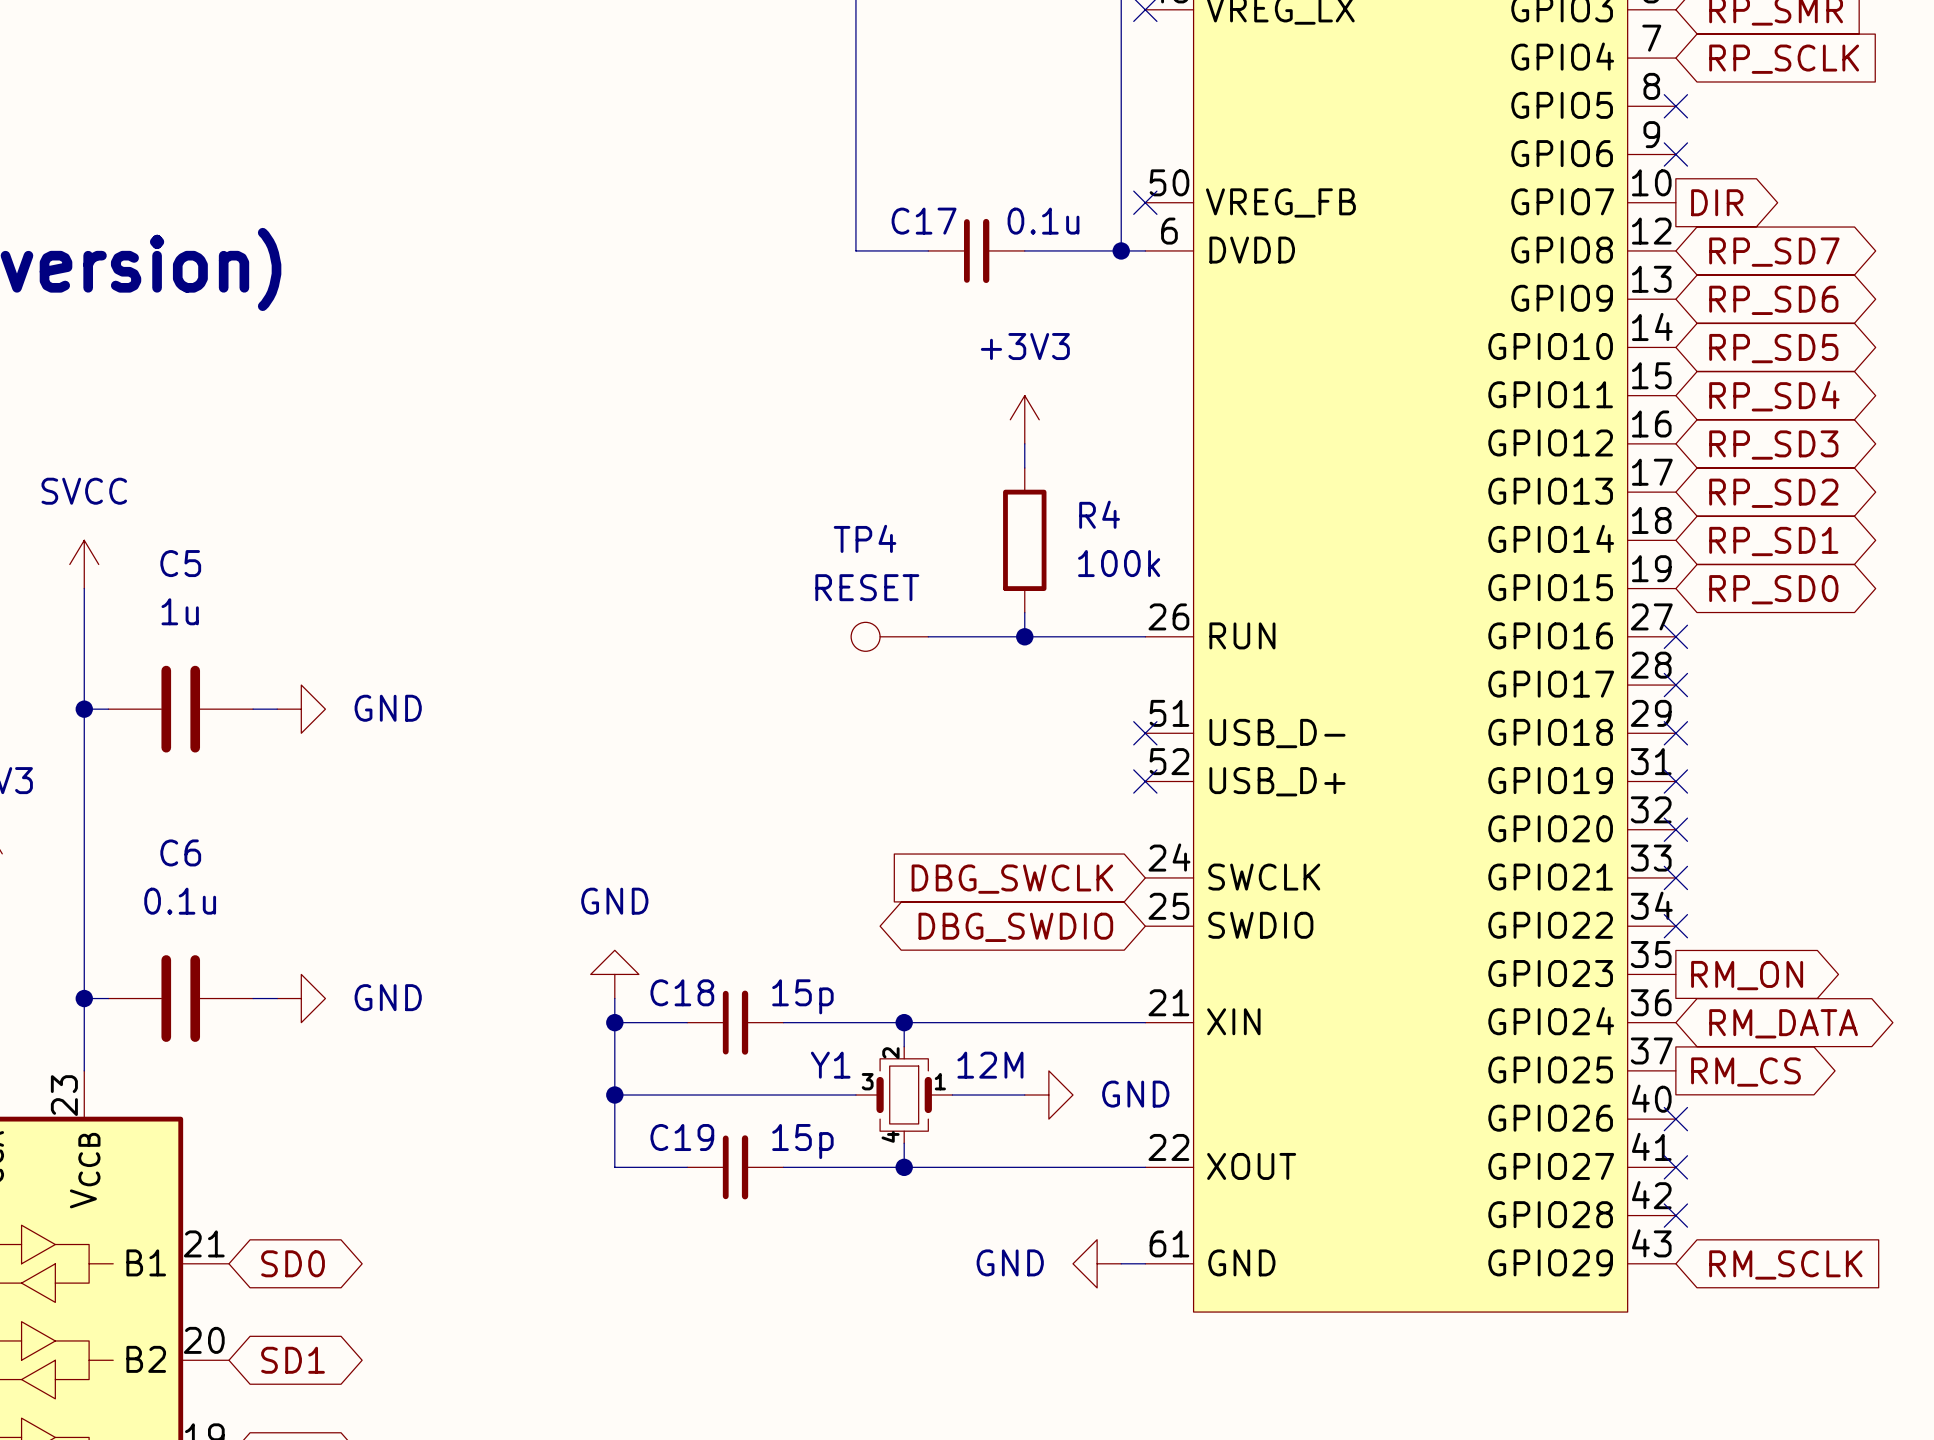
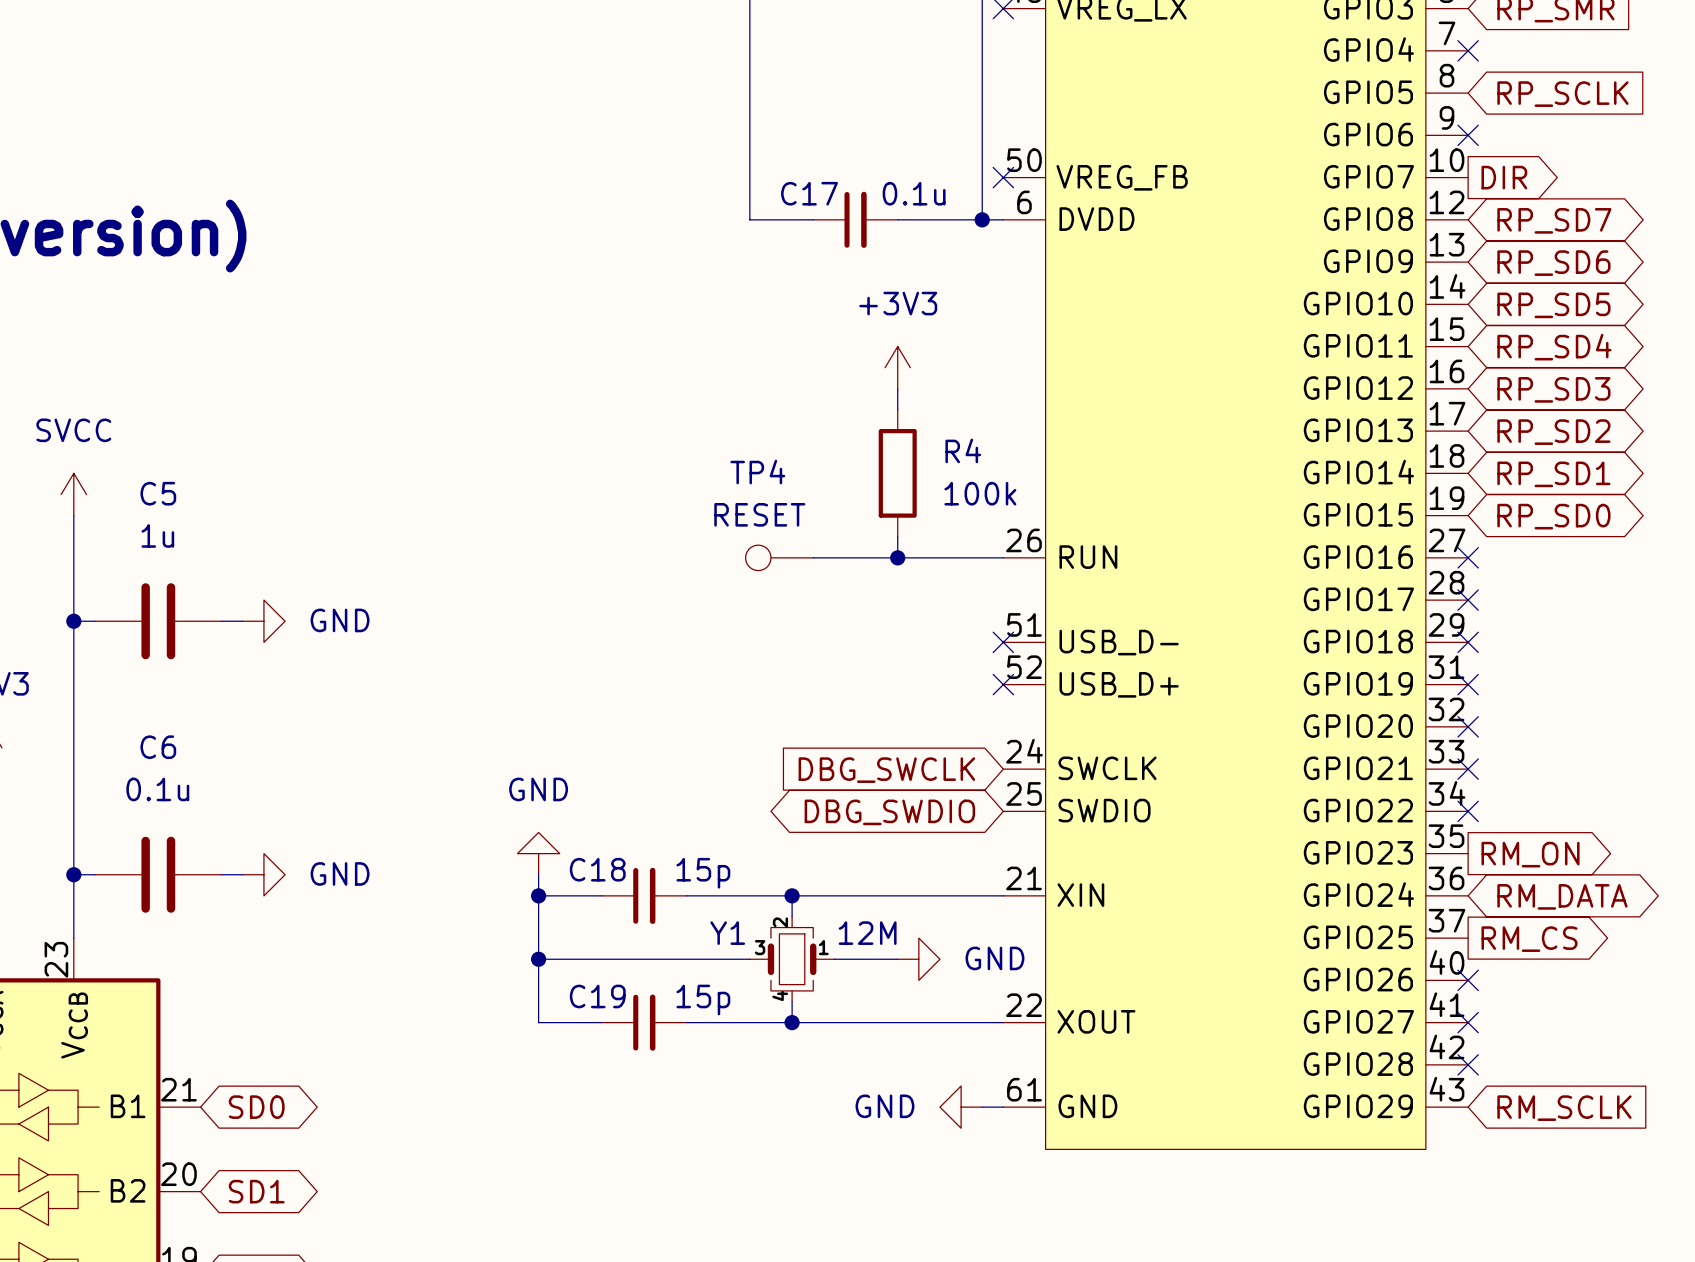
global label position: RP_SCLK (1784, 59) -> RP_SCLK (1562, 94)
no-connect mark position: (1675, 106) -> (1468, 50)

